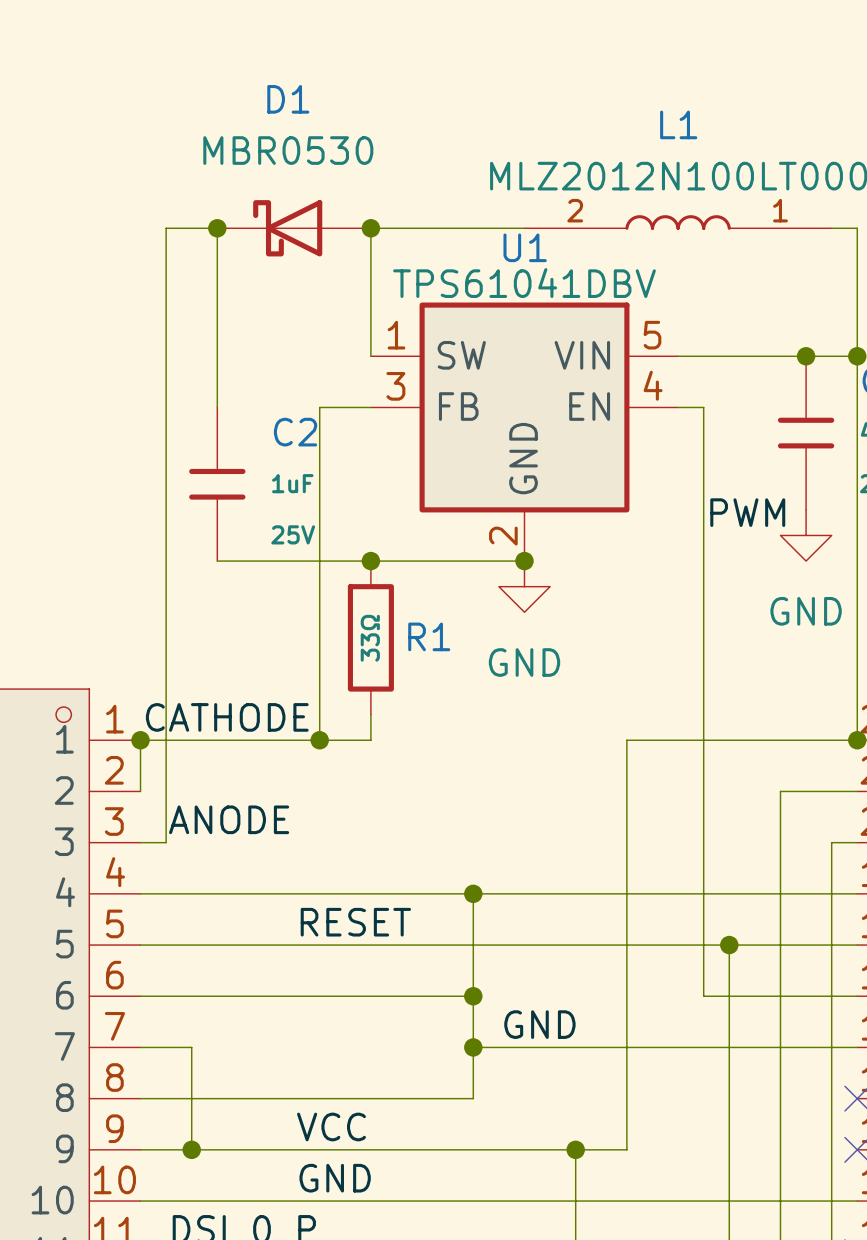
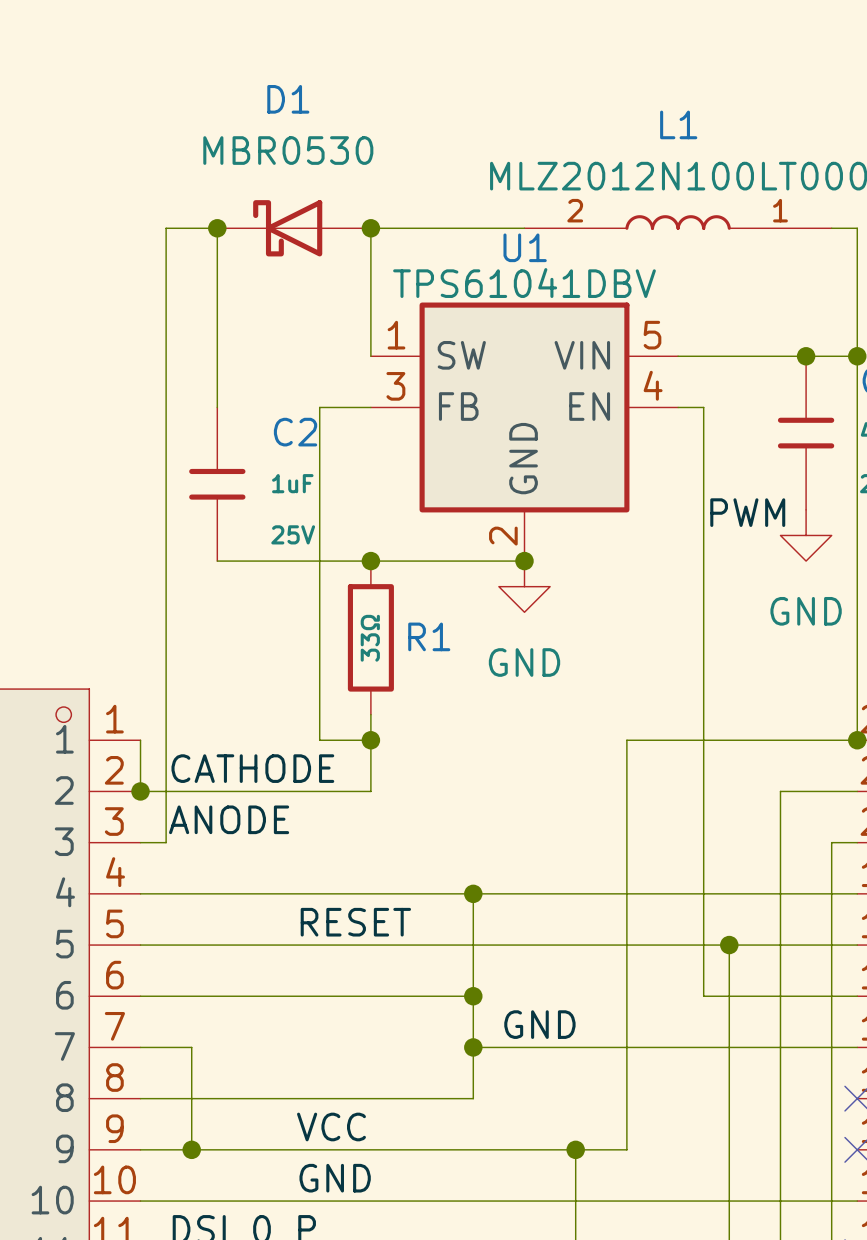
label position: CATHODE (227, 717) -> CATHODE (252, 768)
wire: (140, 740) (319, 740) -> none
junction position: (140, 740) -> (140, 791)
junction position: (319, 740) -> (370, 740)
wire: none -> (370, 740) (370, 791) (140, 791)

